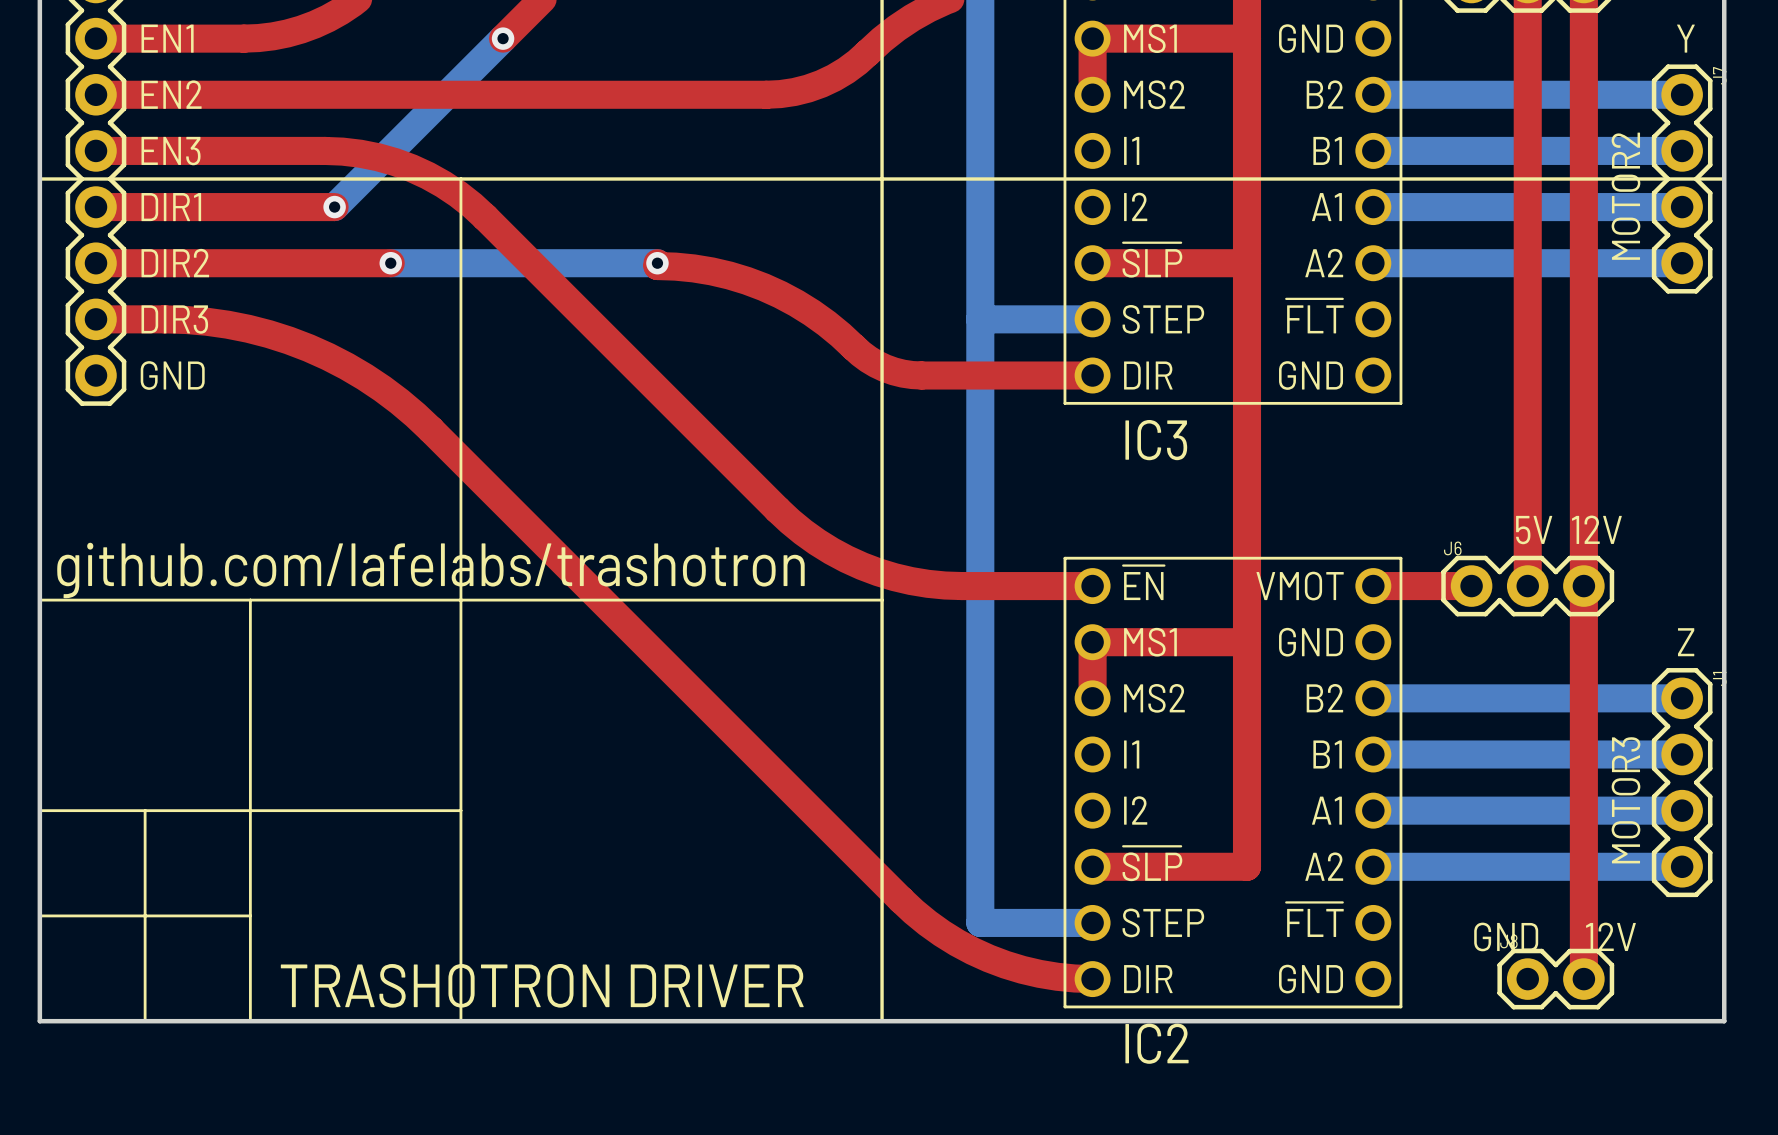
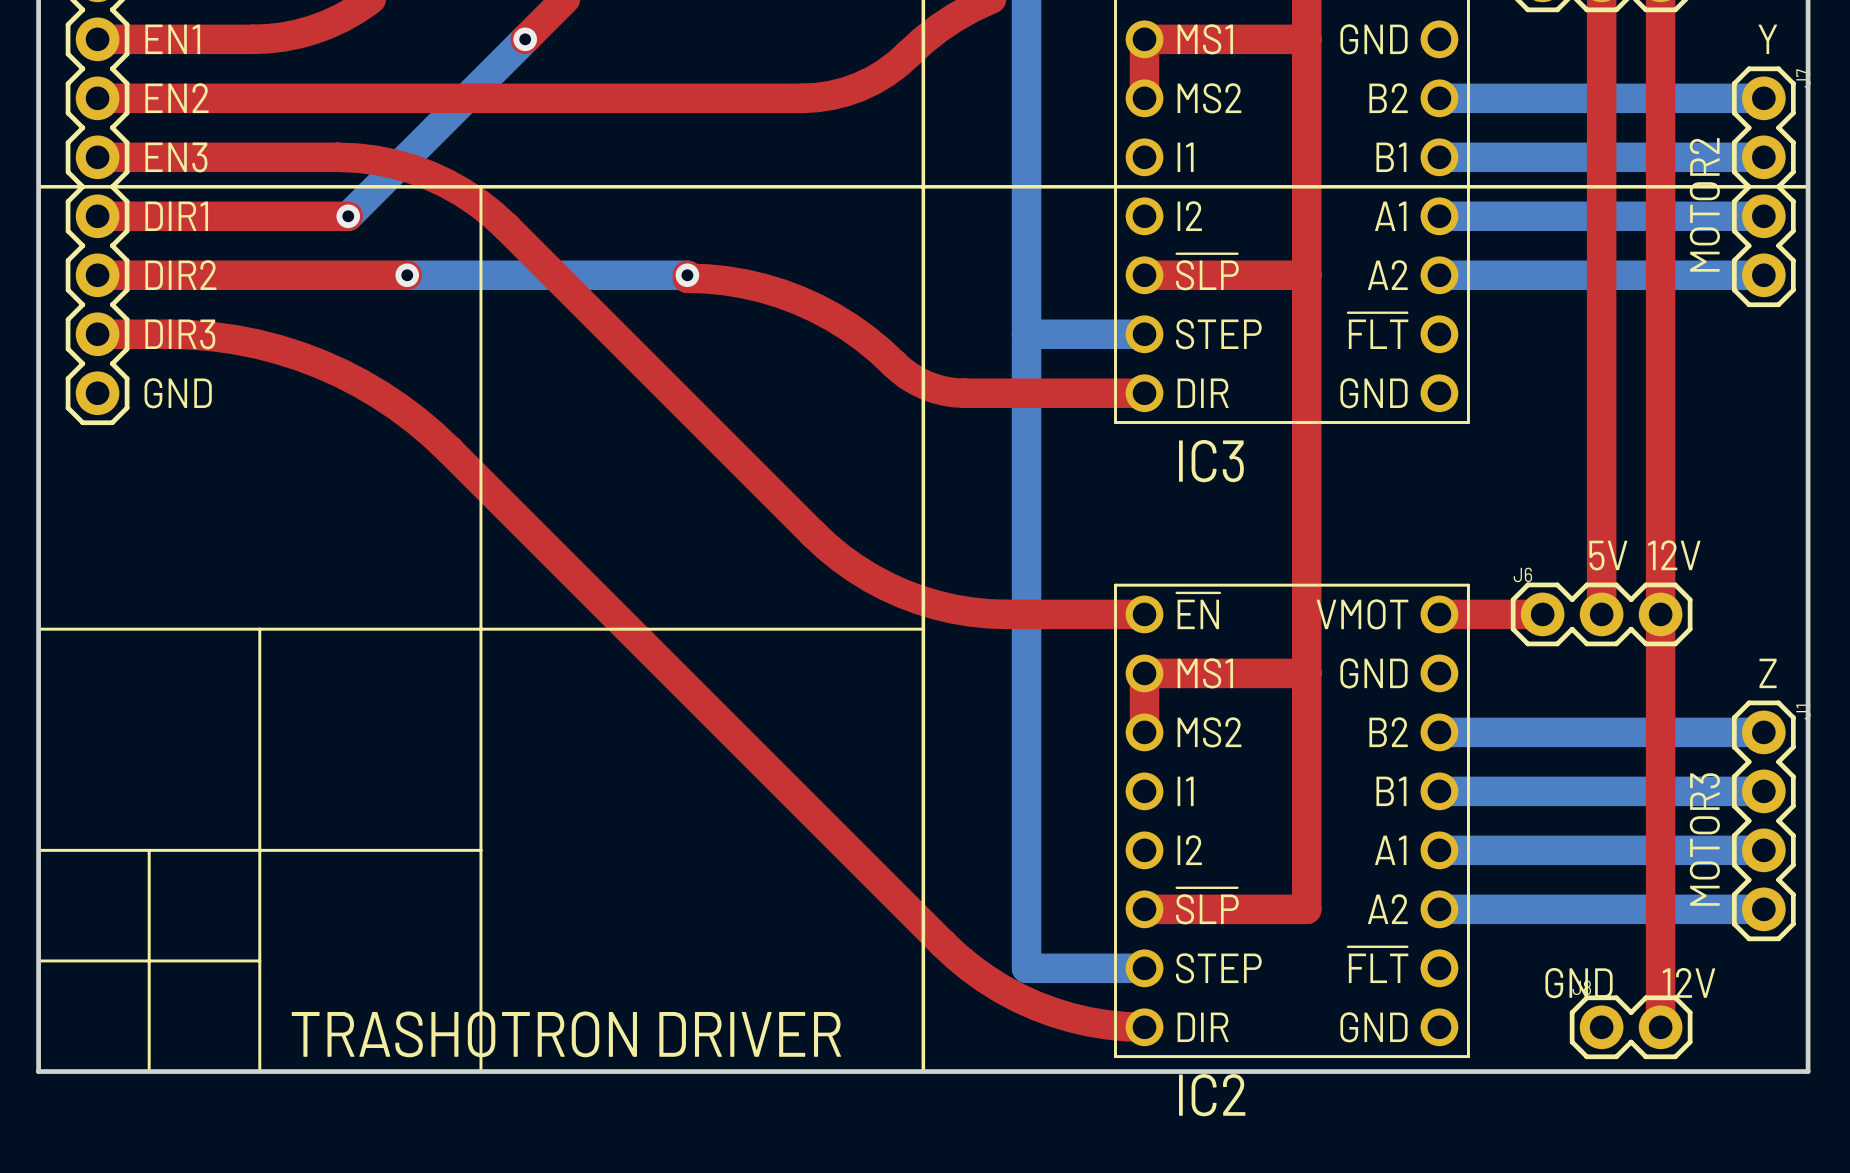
text: github.com/lafelabs/trashotron (430, 570) -> none

